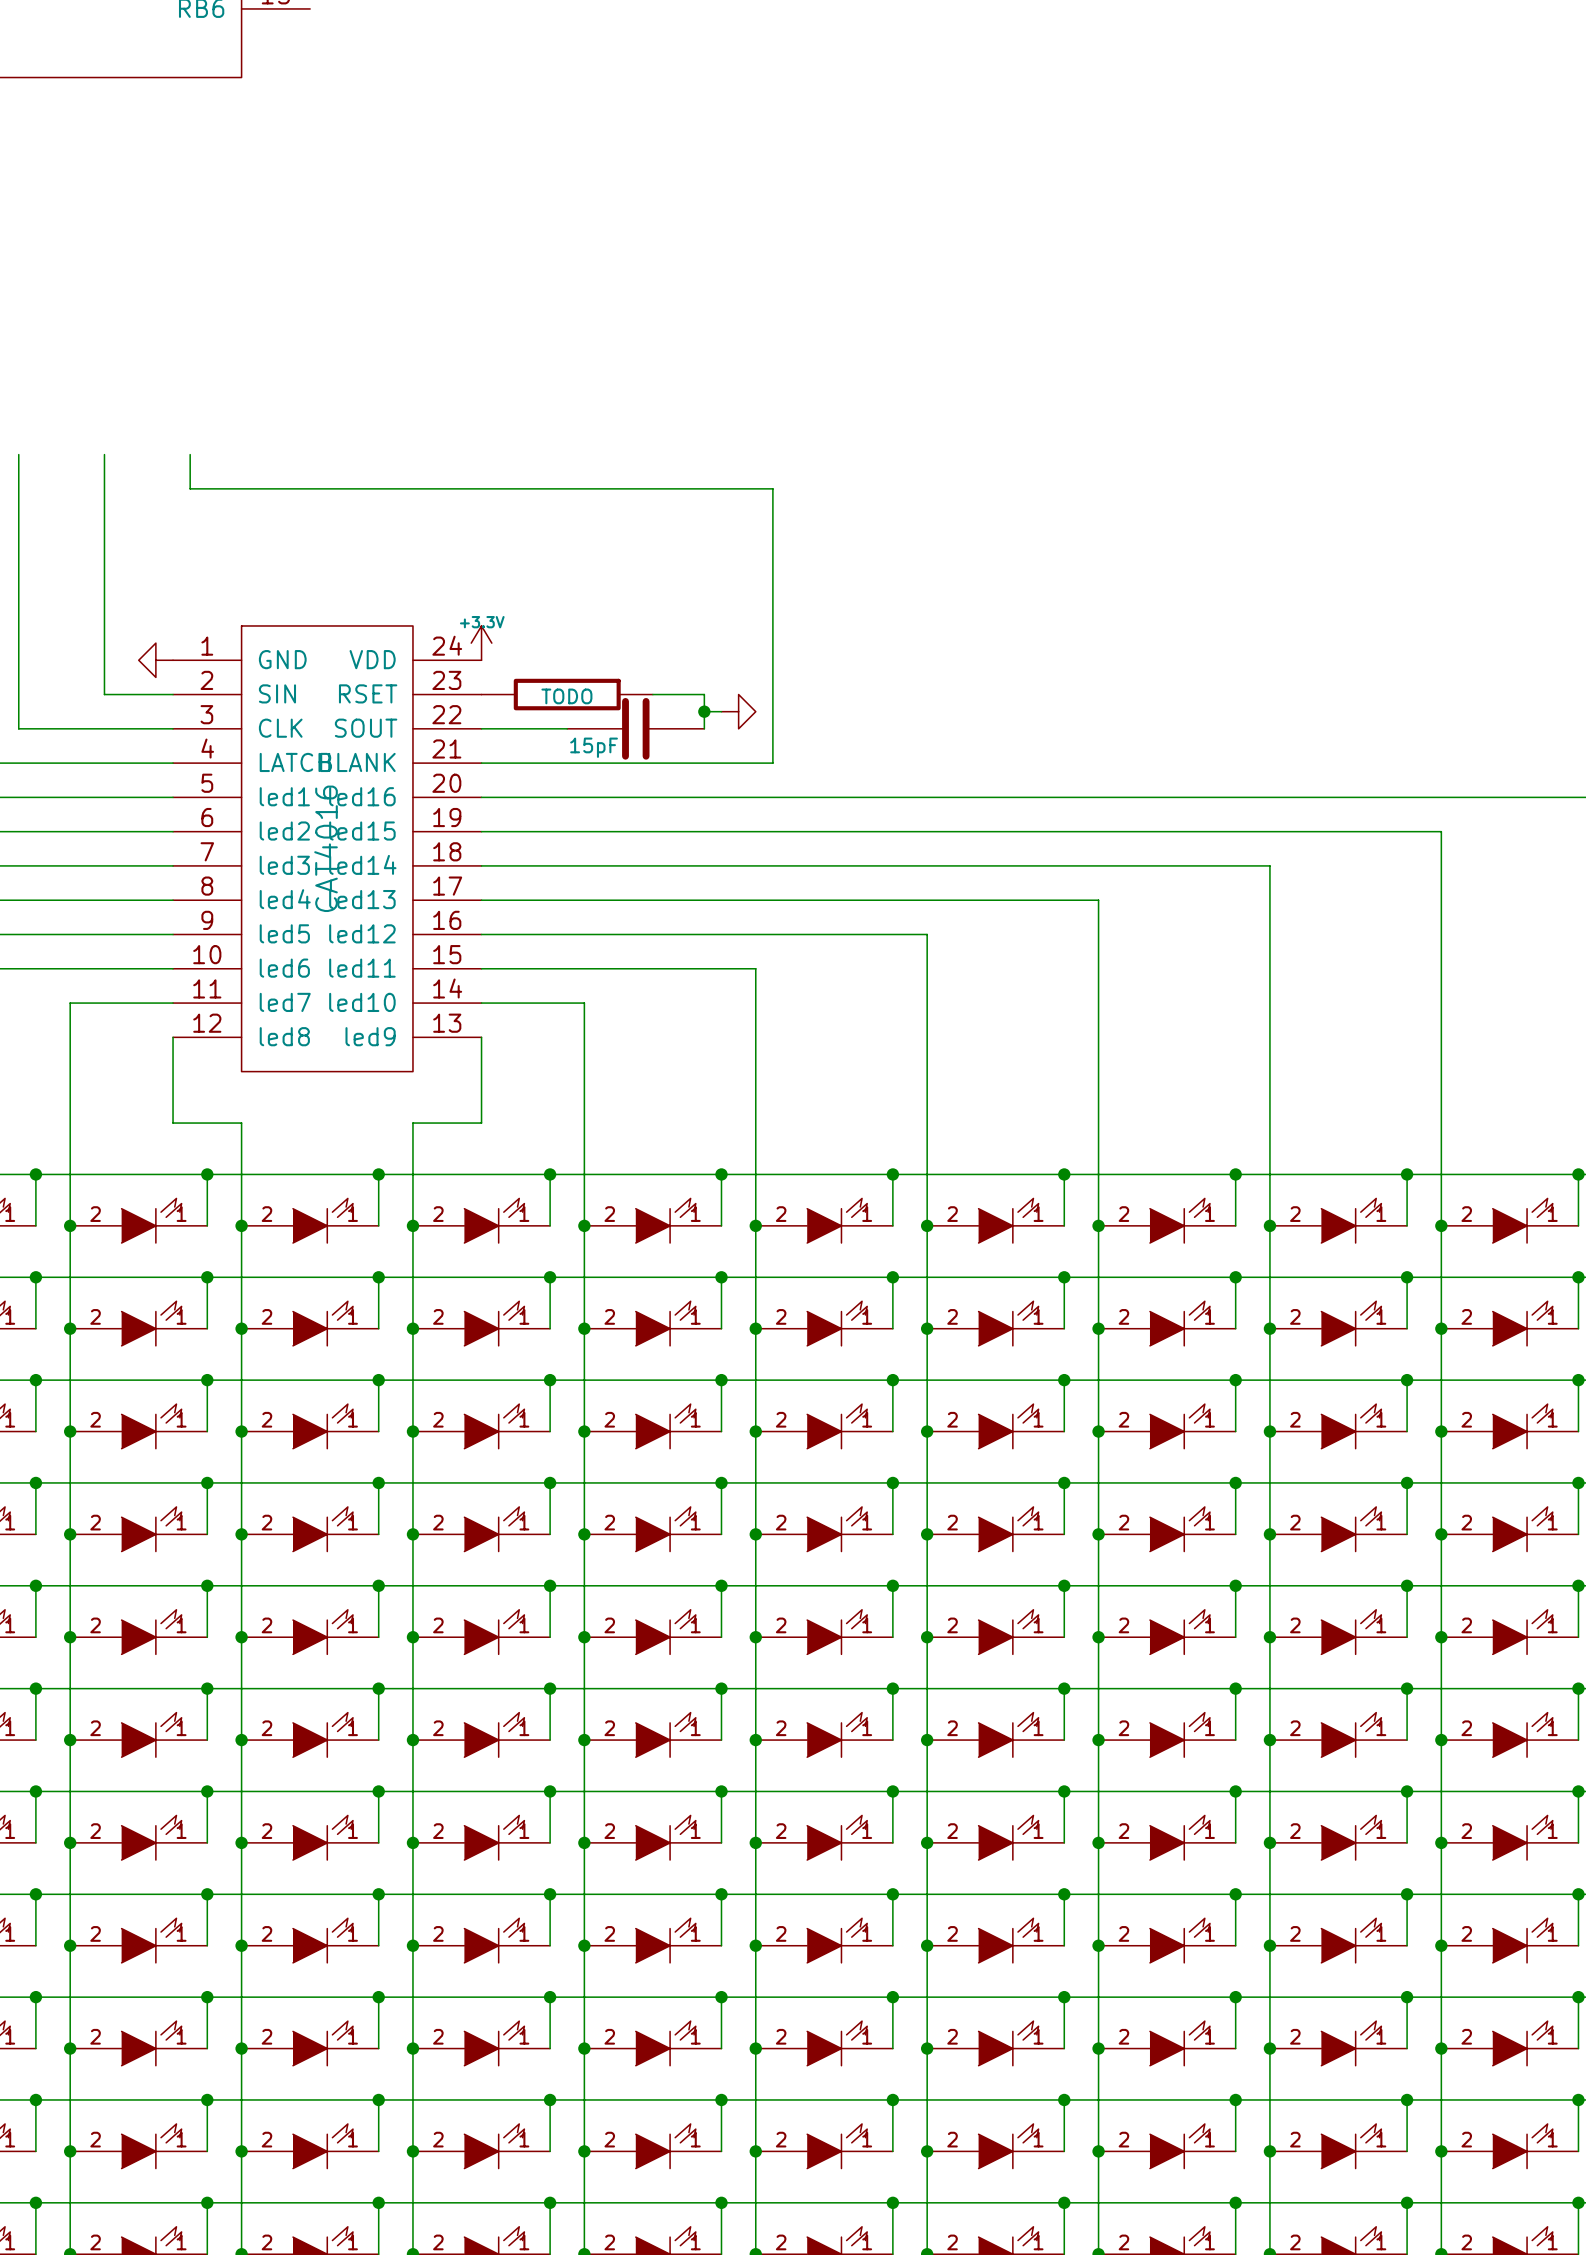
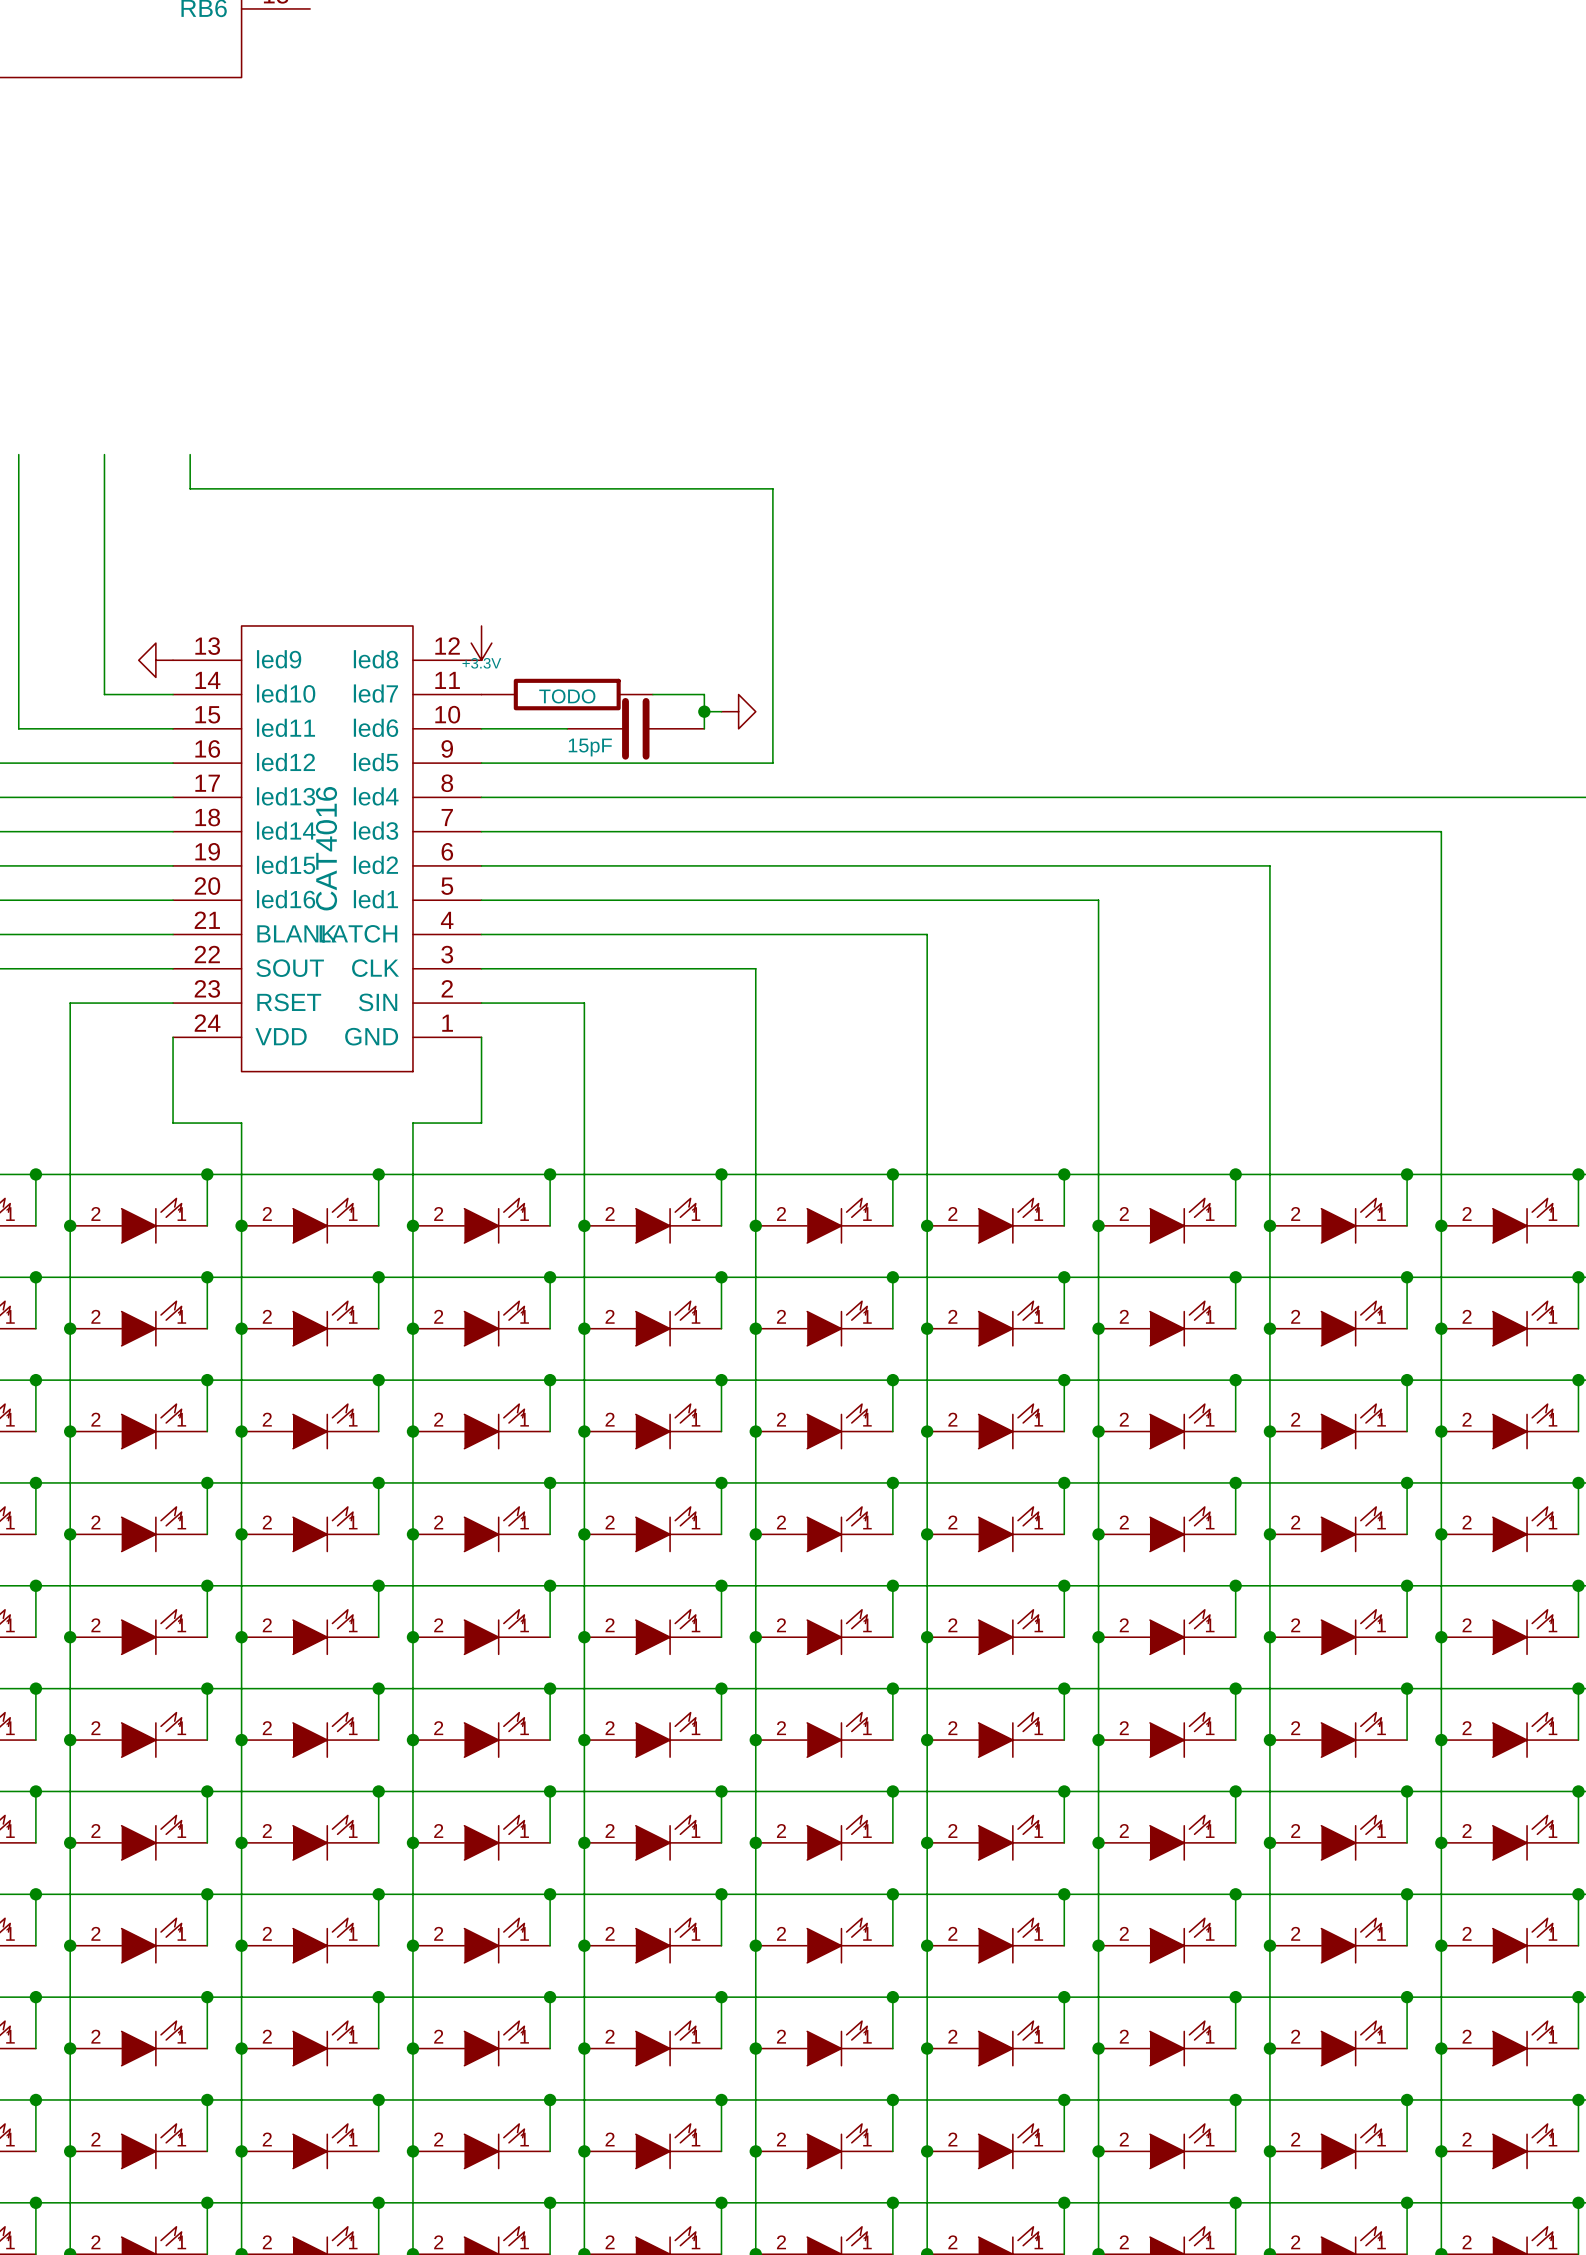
power symbol rotation: 0° (481, 643) -> 180° (481, 643)
part rotation: 0° (327, 848) -> 180° (327, 848)

